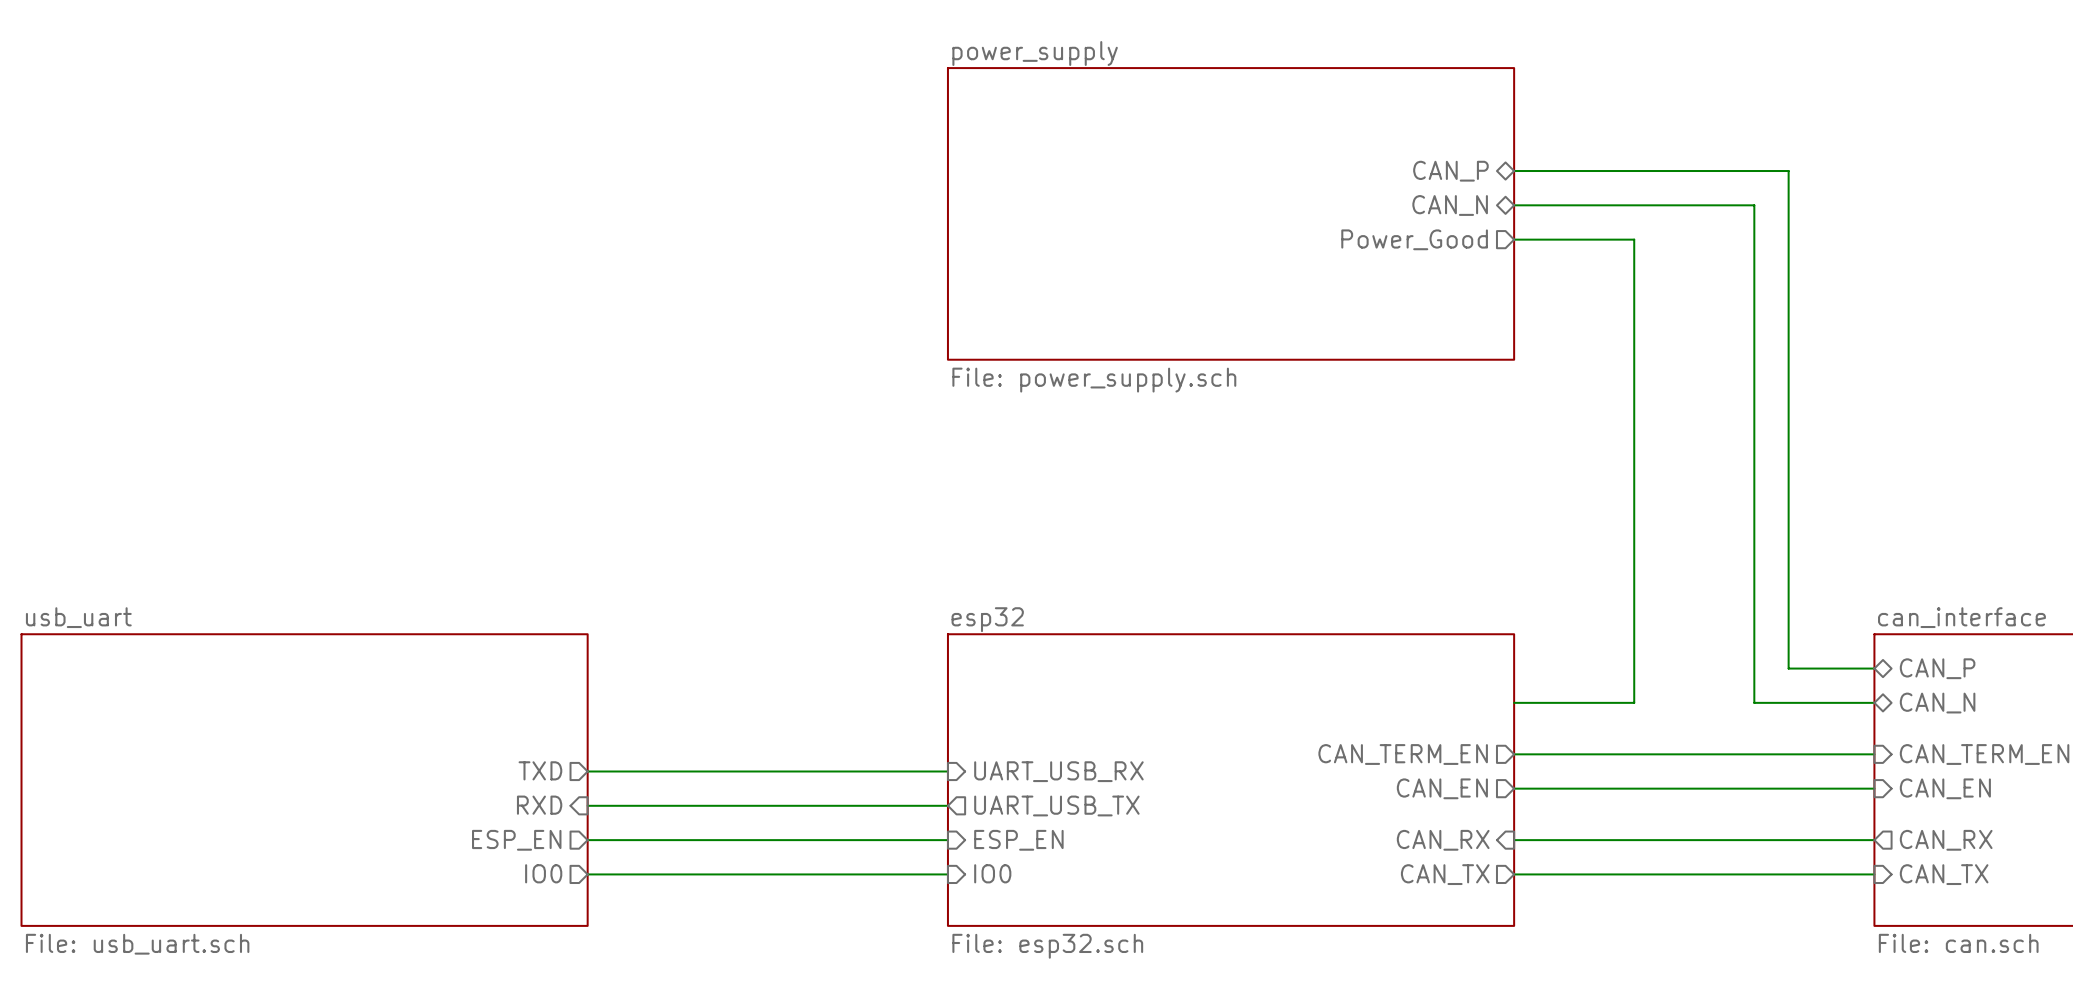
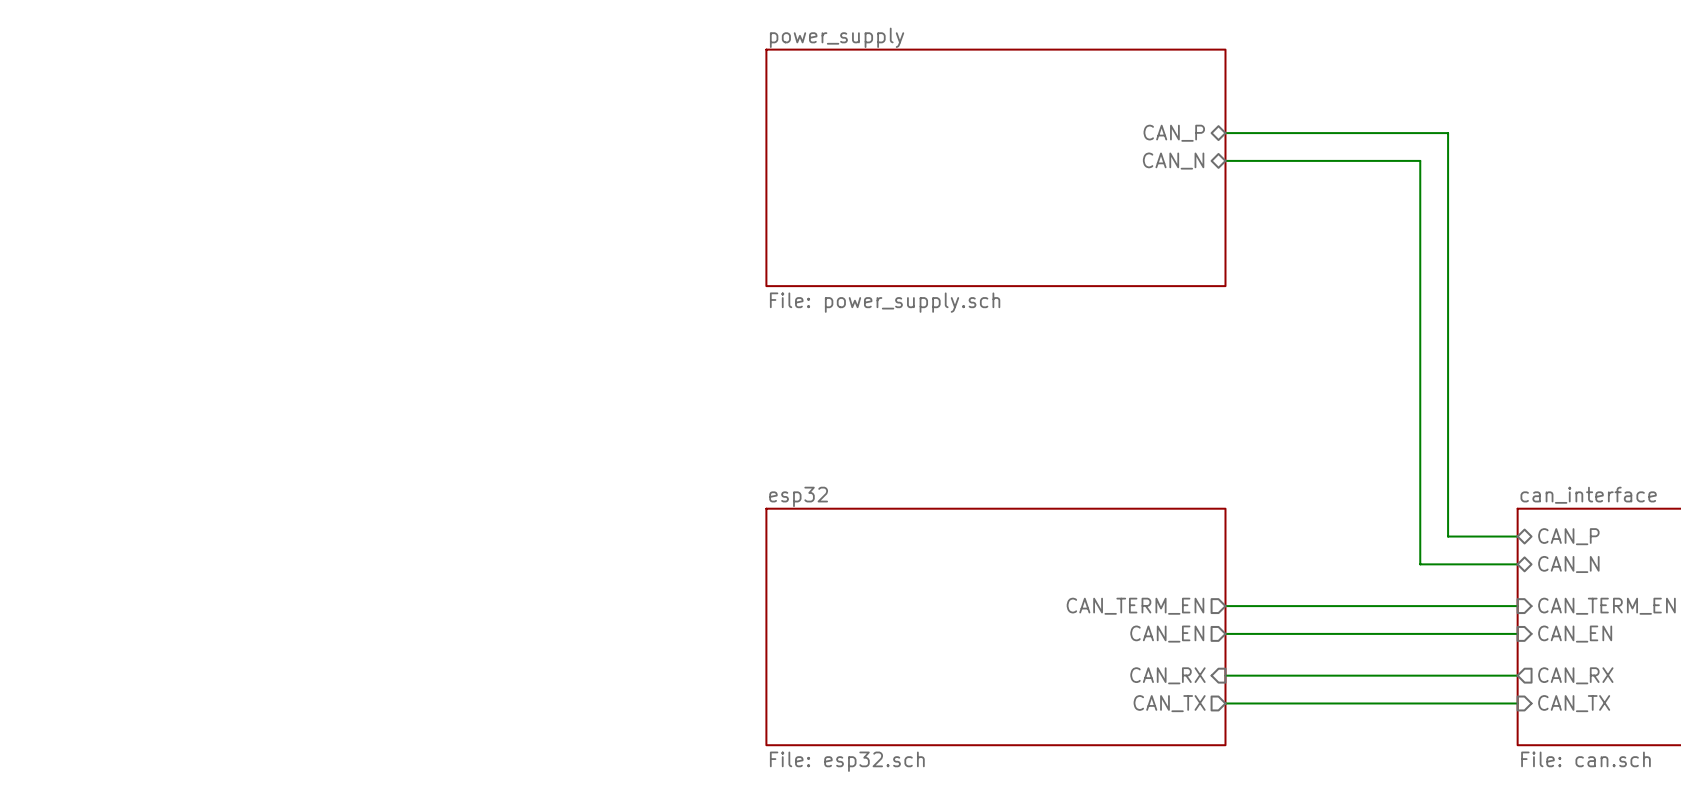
sheet pin: Power_Good (1414, 239) -> none
wire: (1514, 239) (1634, 239) (1634, 702) (1514, 702) -> none
sheet pin: TXD (540, 770) -> none
wire: (587, 771) (947, 771) -> none
sheet pin: UART_USB_RX (1058, 771) -> none
sheet usb_uart: File: usb_uart.sch (304, 780) -> none
sheet pin: RXD (539, 805) -> none
wire: (587, 805) (947, 805) -> none
sheet pin: UART_USB_TX (1056, 805) -> none
sheet pin: ESP_EN (516, 840) -> none
wire: (587, 840) (947, 840) -> none
sheet pin: ESP_EN (1018, 840) -> none
sheet pin: IO0 (543, 873) -> none
sheet pin: IO0 (992, 873) -> none
wire: (587, 874) (947, 874) -> none

